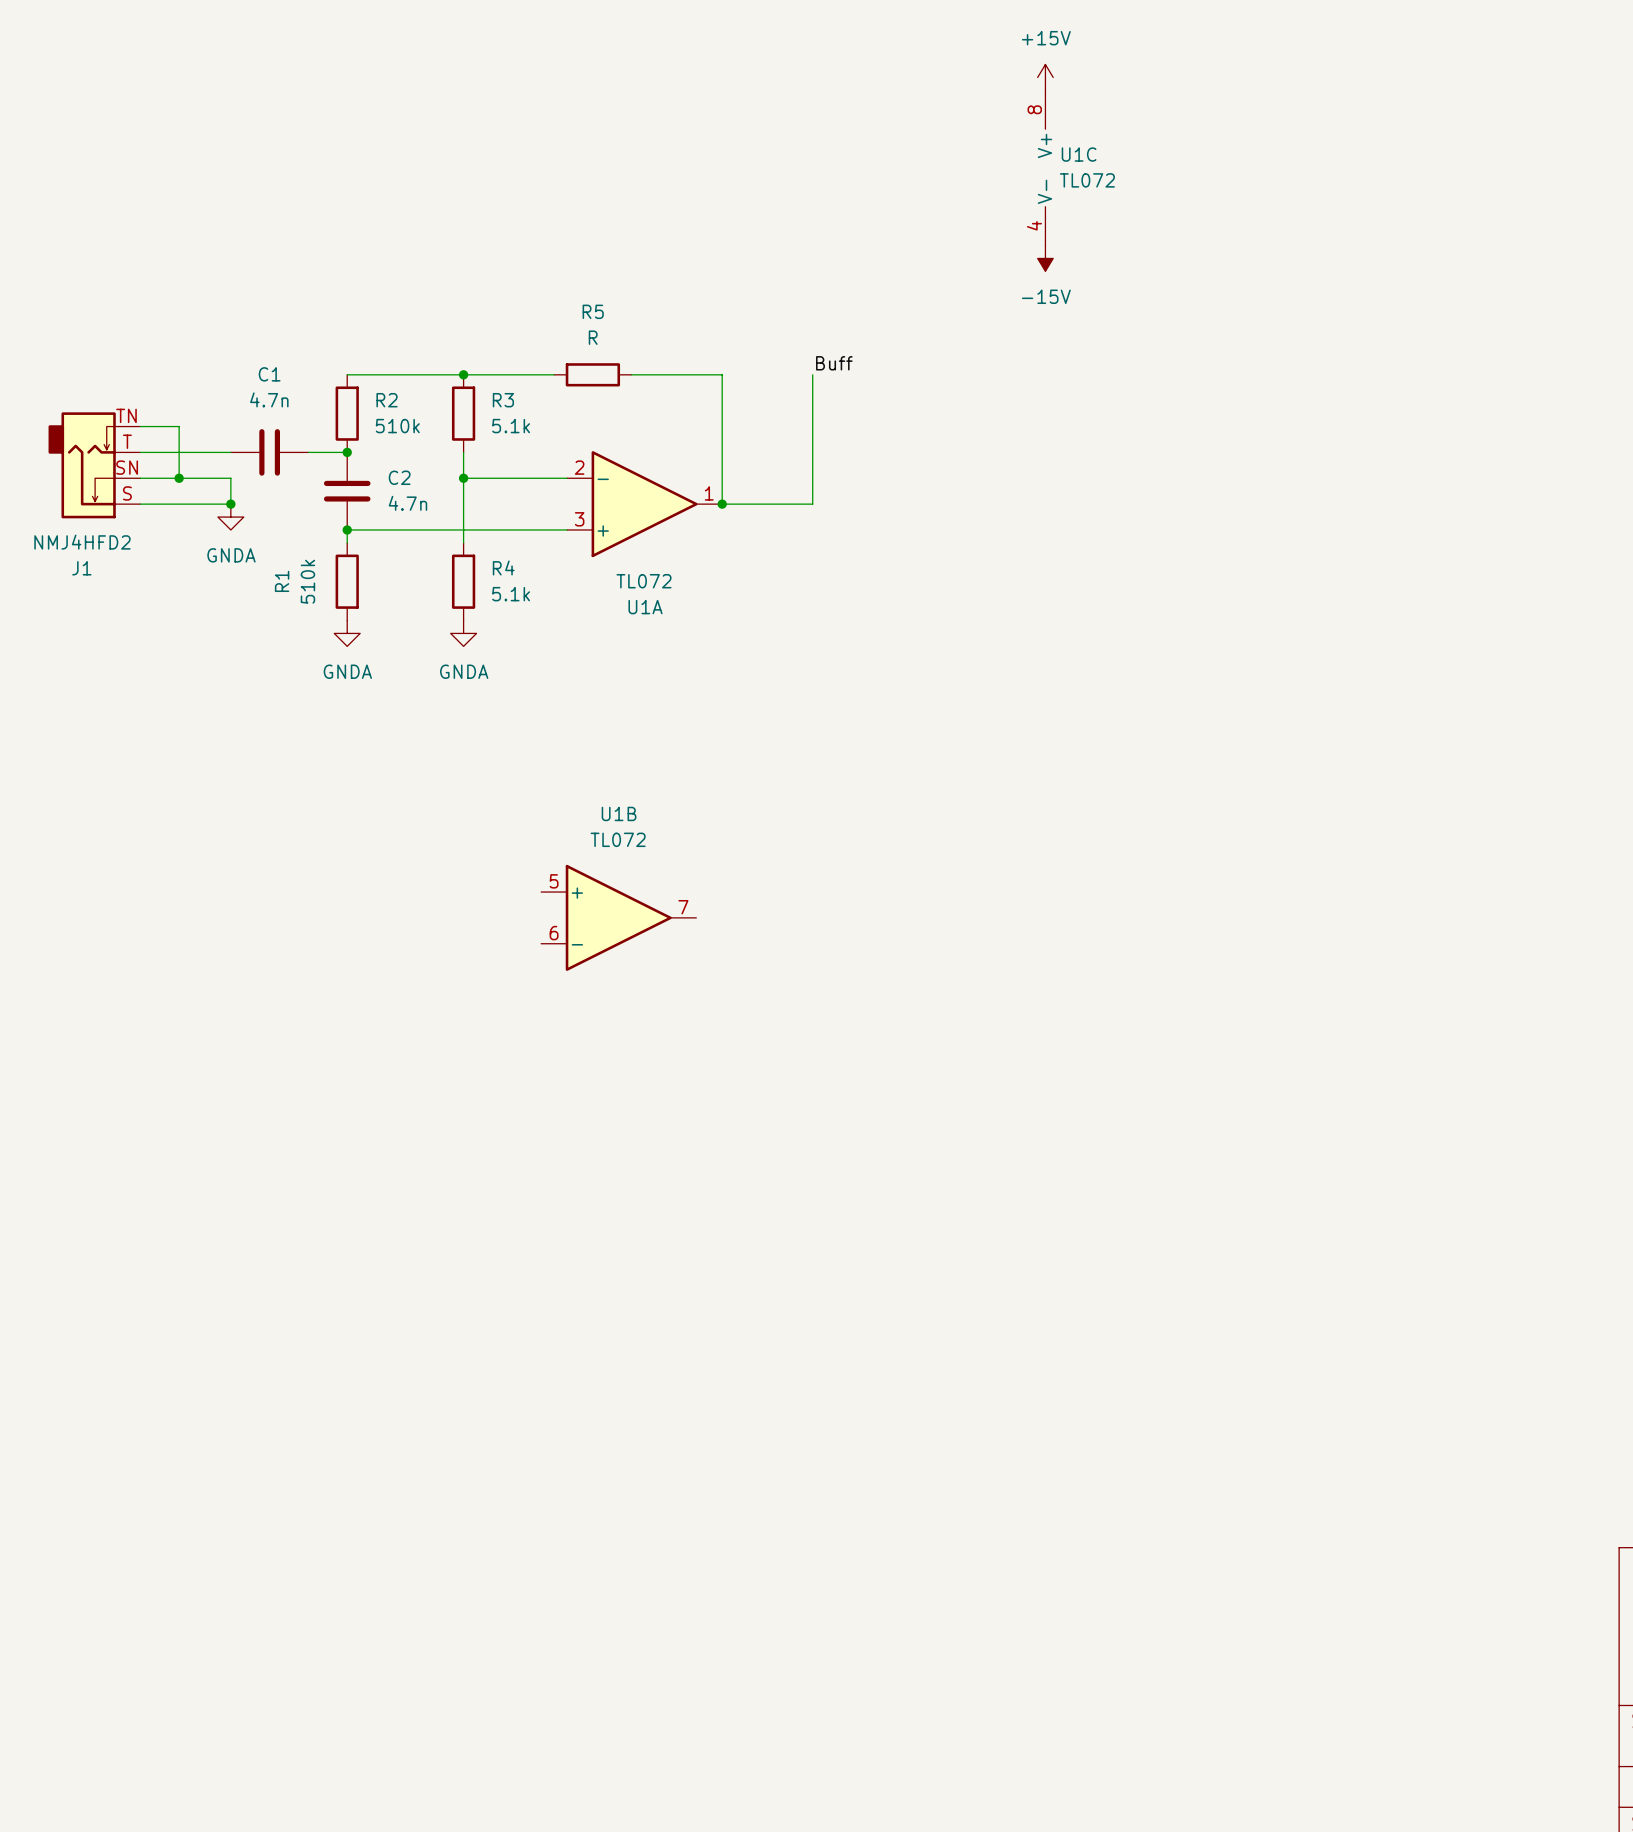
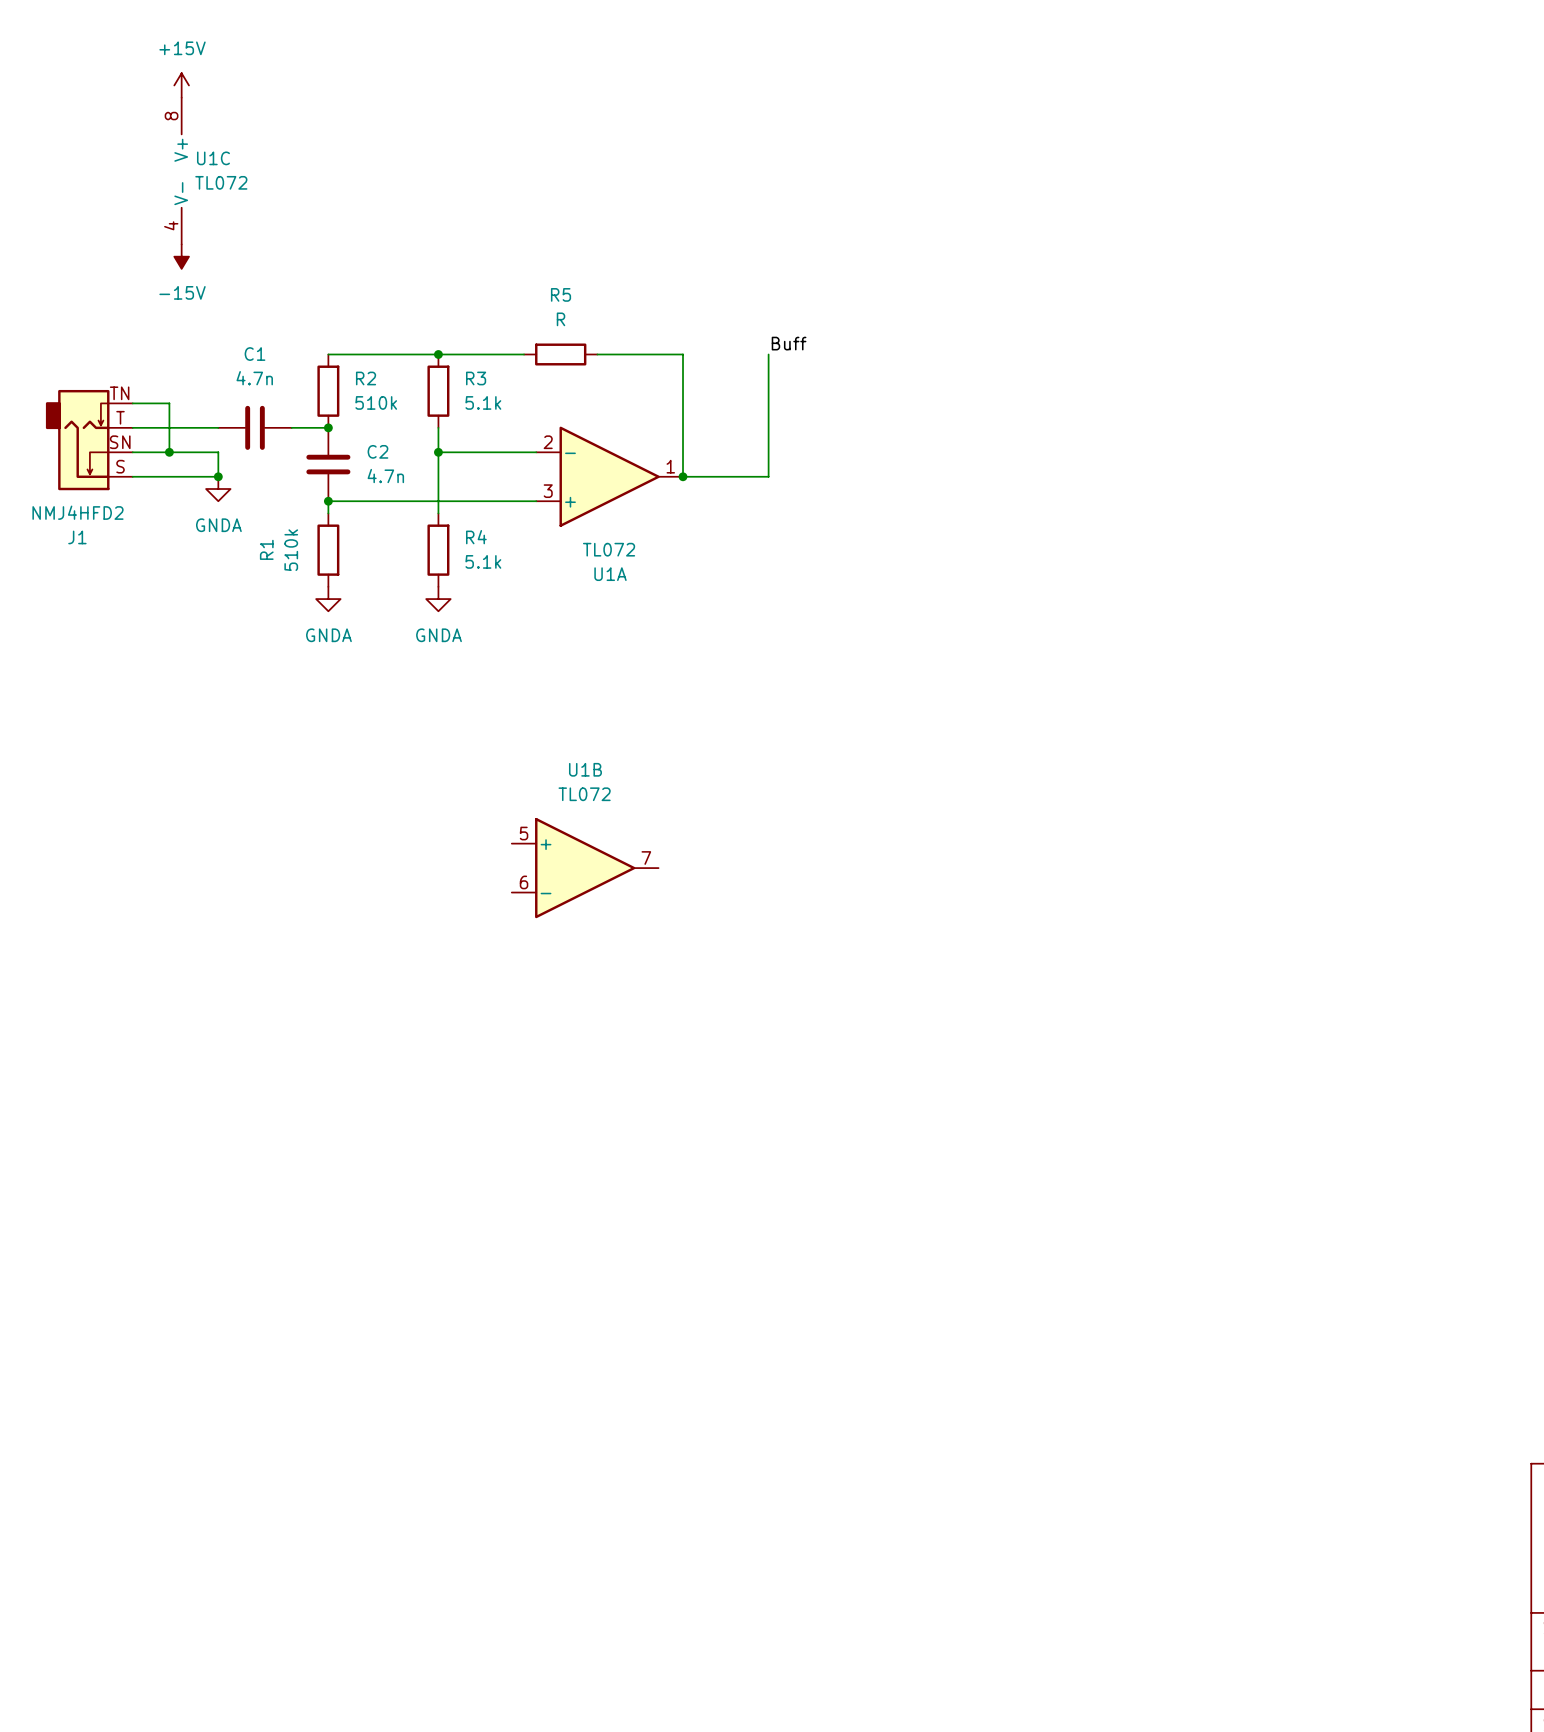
power symbol: +15V (1045, 77) -> none
power symbol: none -> +15V (181, 85)
U1C position: (1045, 167) -> (181, 171)
power symbol: -15V (1045, 258) -> none
power symbol: none -> -15V (181, 256)

